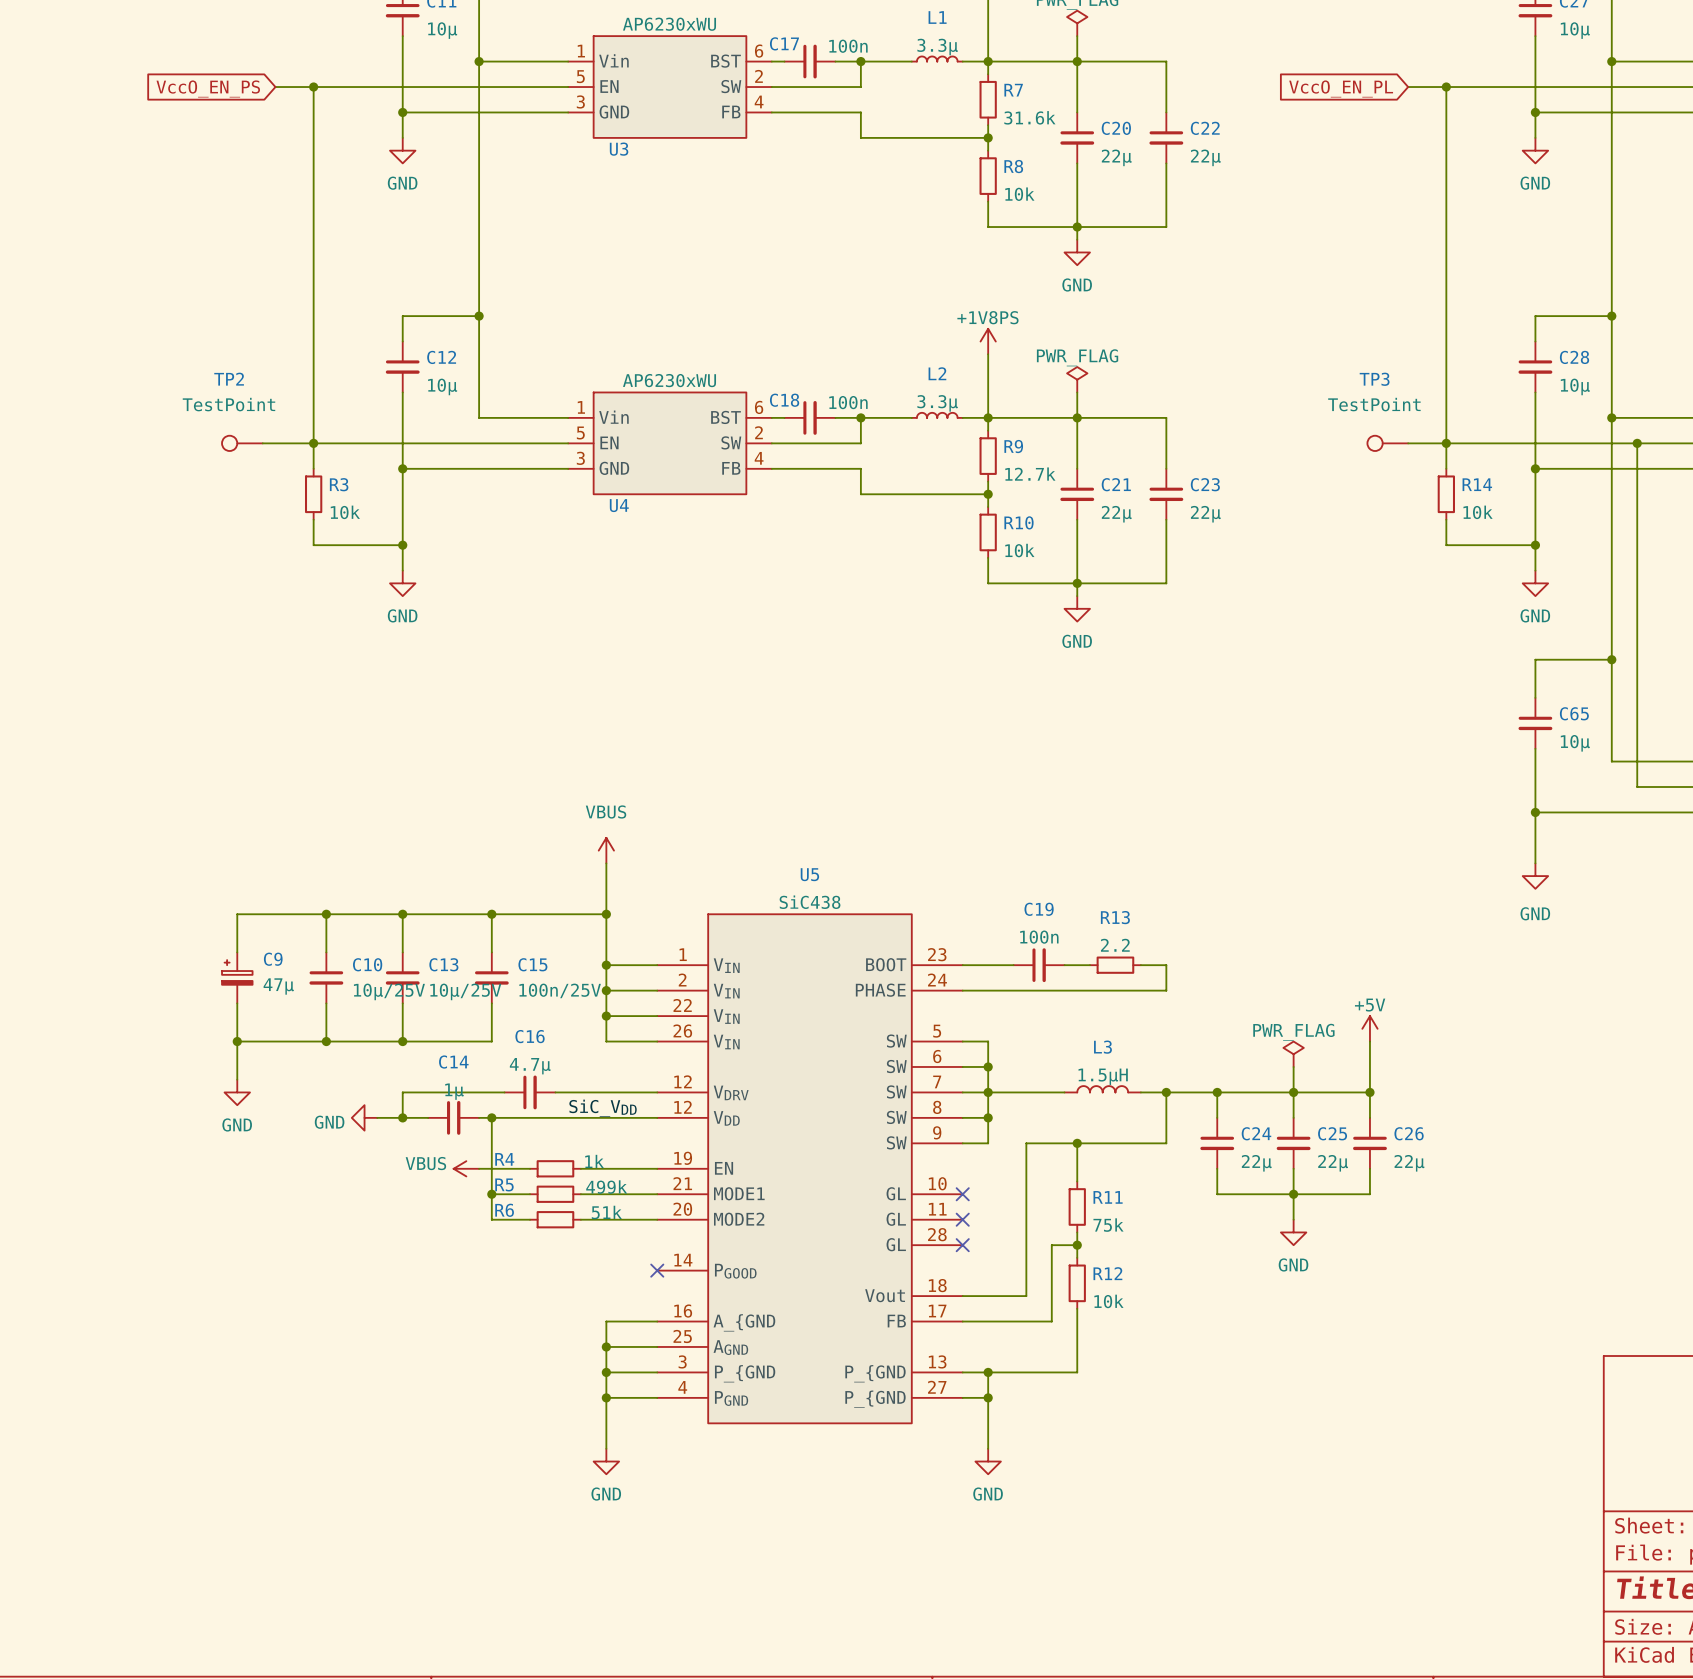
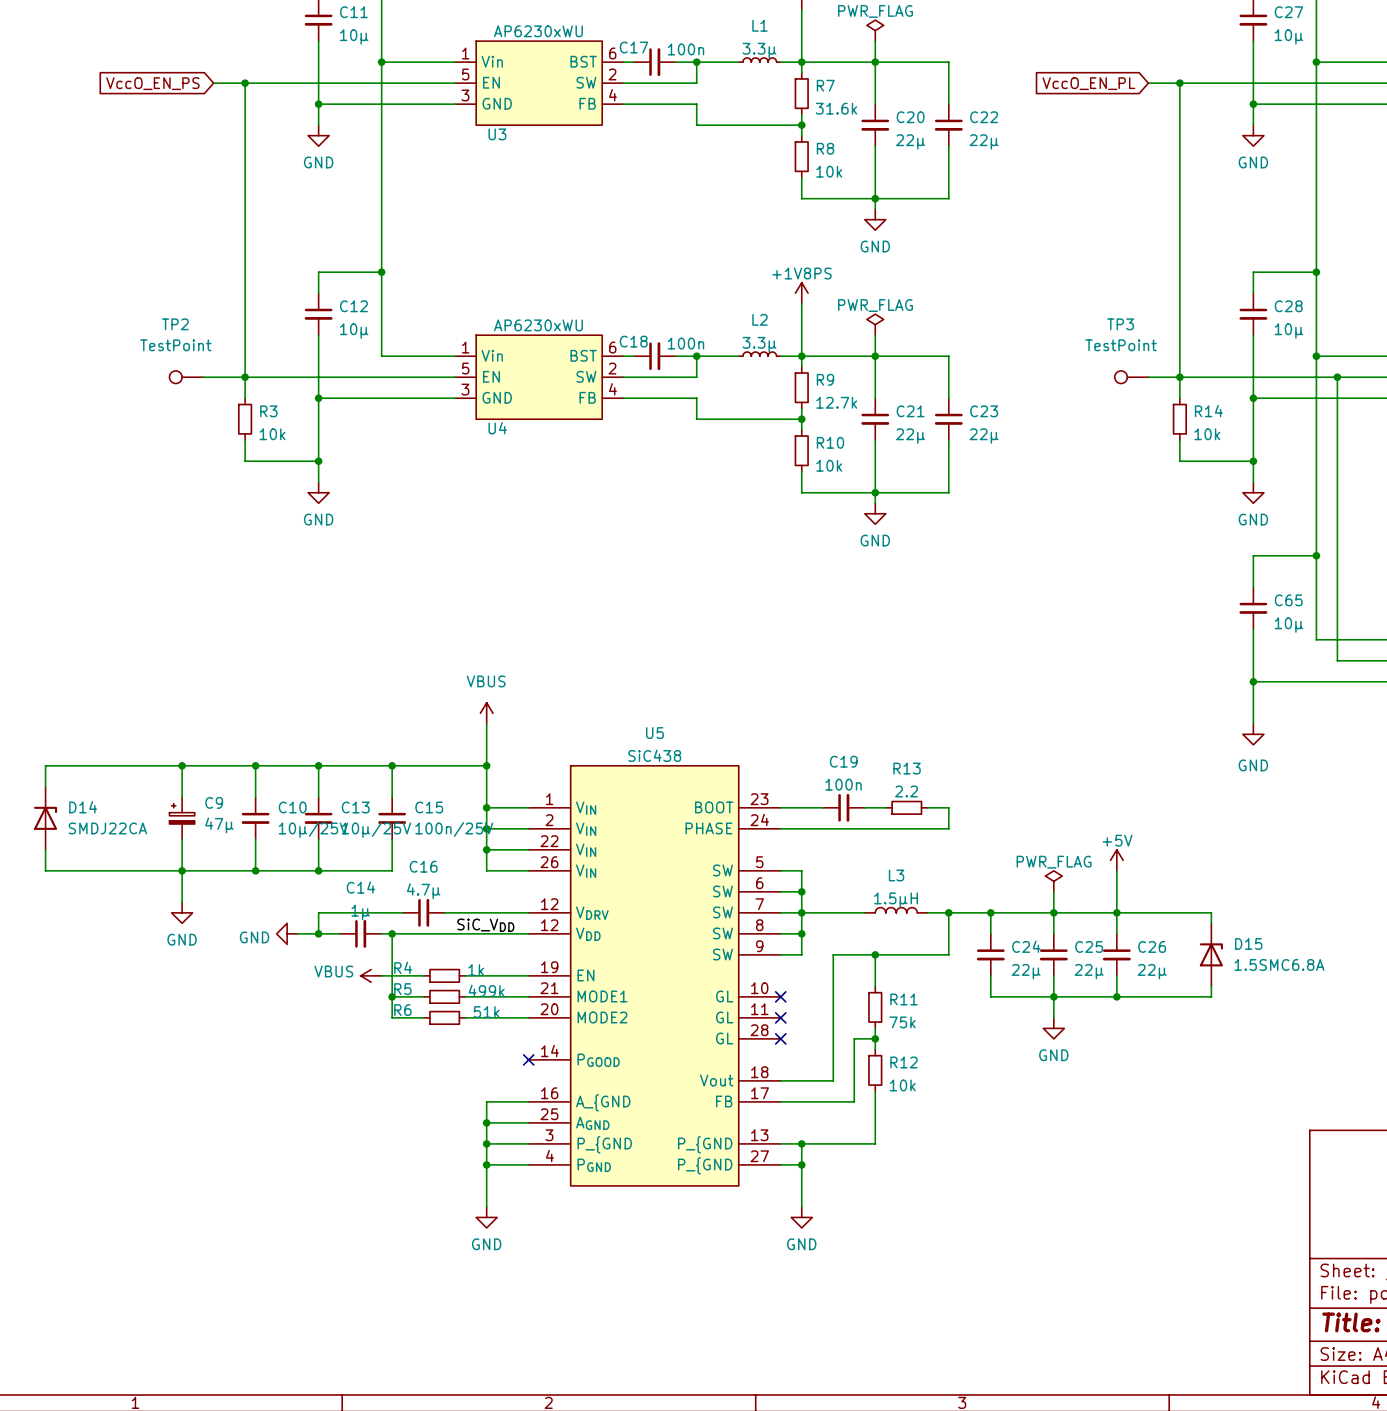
wire: none -> (182, 765) (45, 765) (45, 786)
junction: none -> (182, 765)
D14: none -> SMDJ22CA (45, 818)
wire: none -> (45, 849) (45, 870) (182, 870)
wire: none -> (1116, 912) (1211, 912) (1211, 923)
D15: none -> 1.5SMC6.8A (1211, 954)
wire: none -> (1211, 986) (1211, 996) (1116, 996)
junction: none -> (1116, 996)

